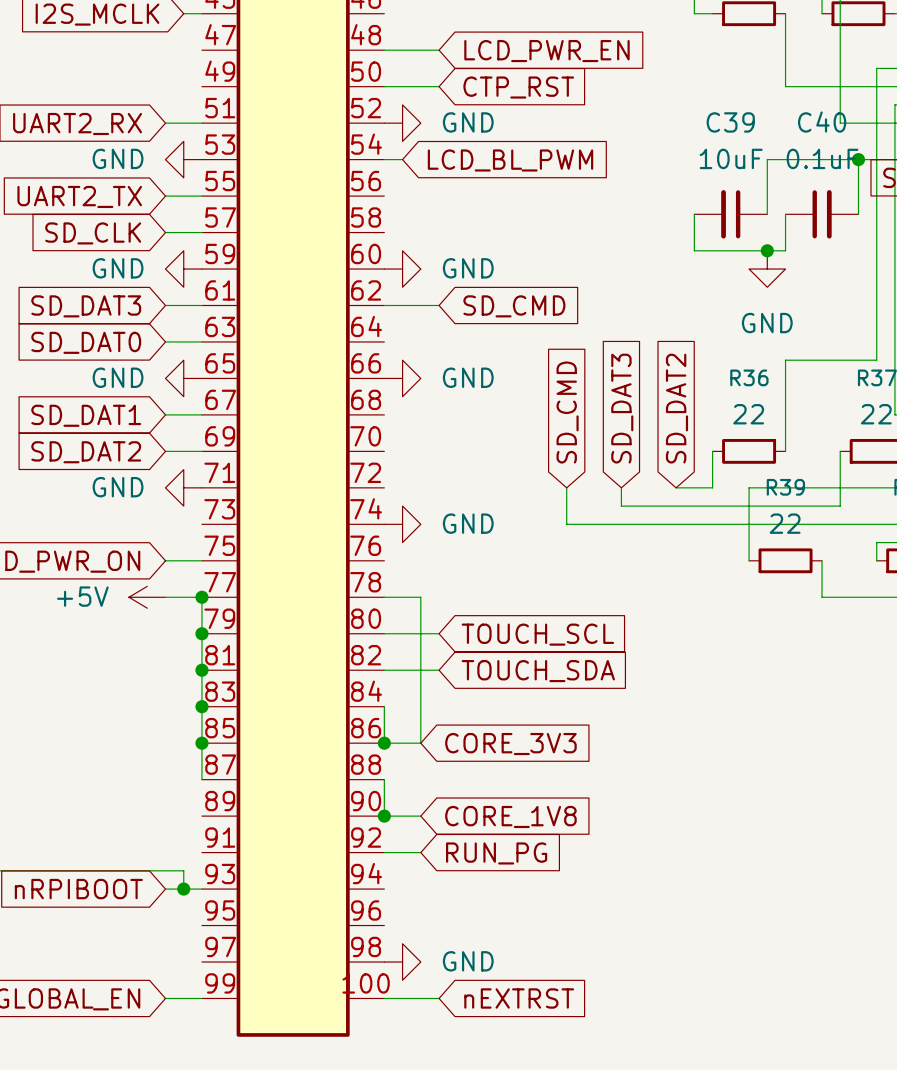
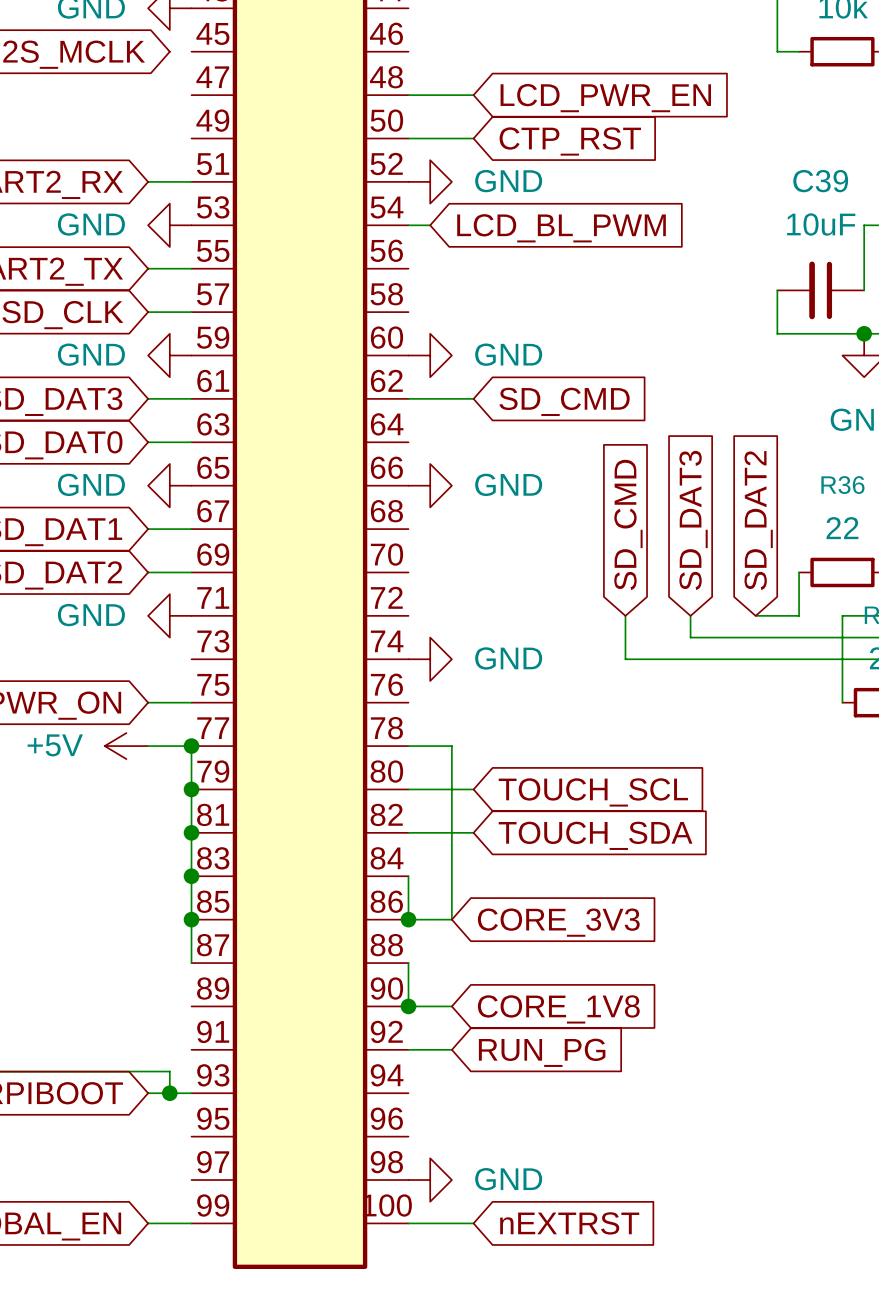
wire: (183, 13) (201, 13) -> none

